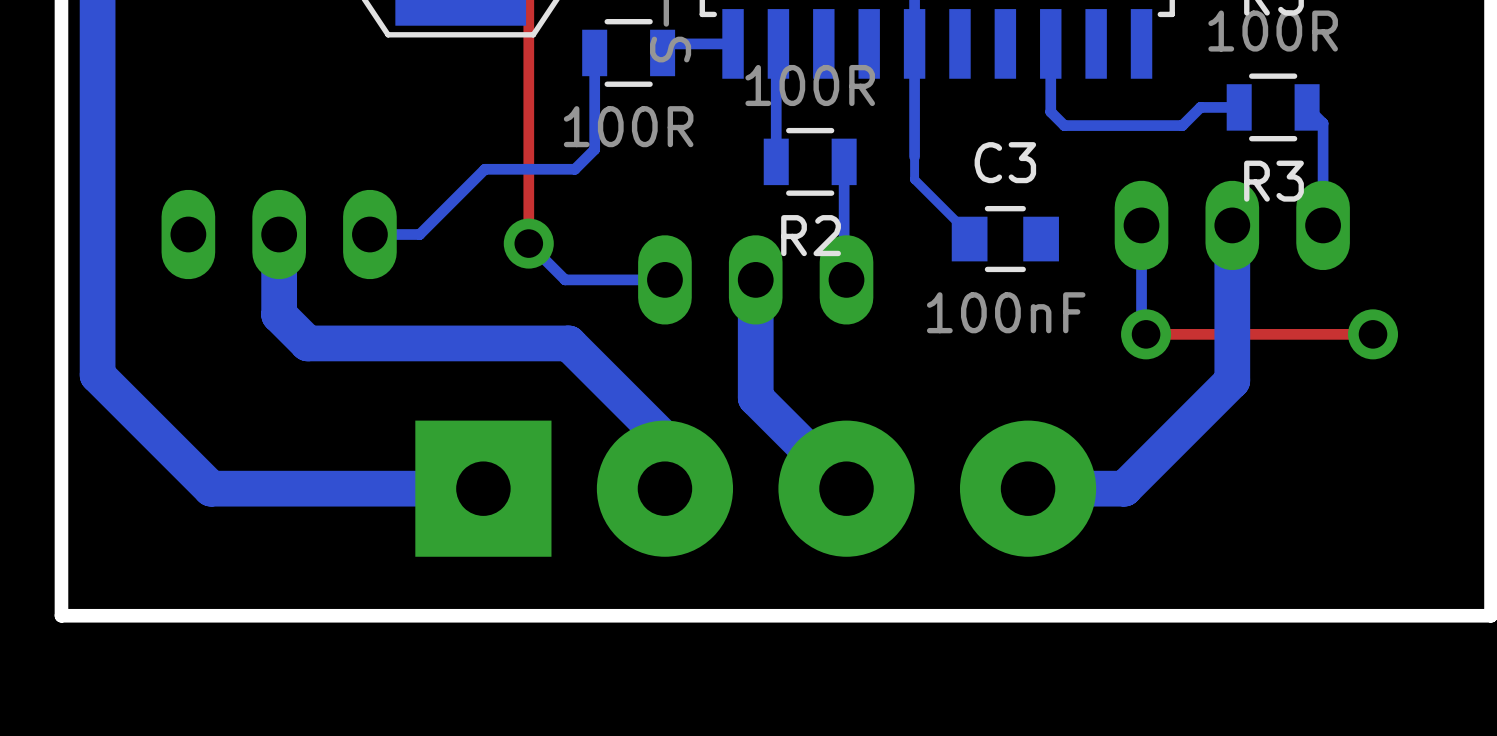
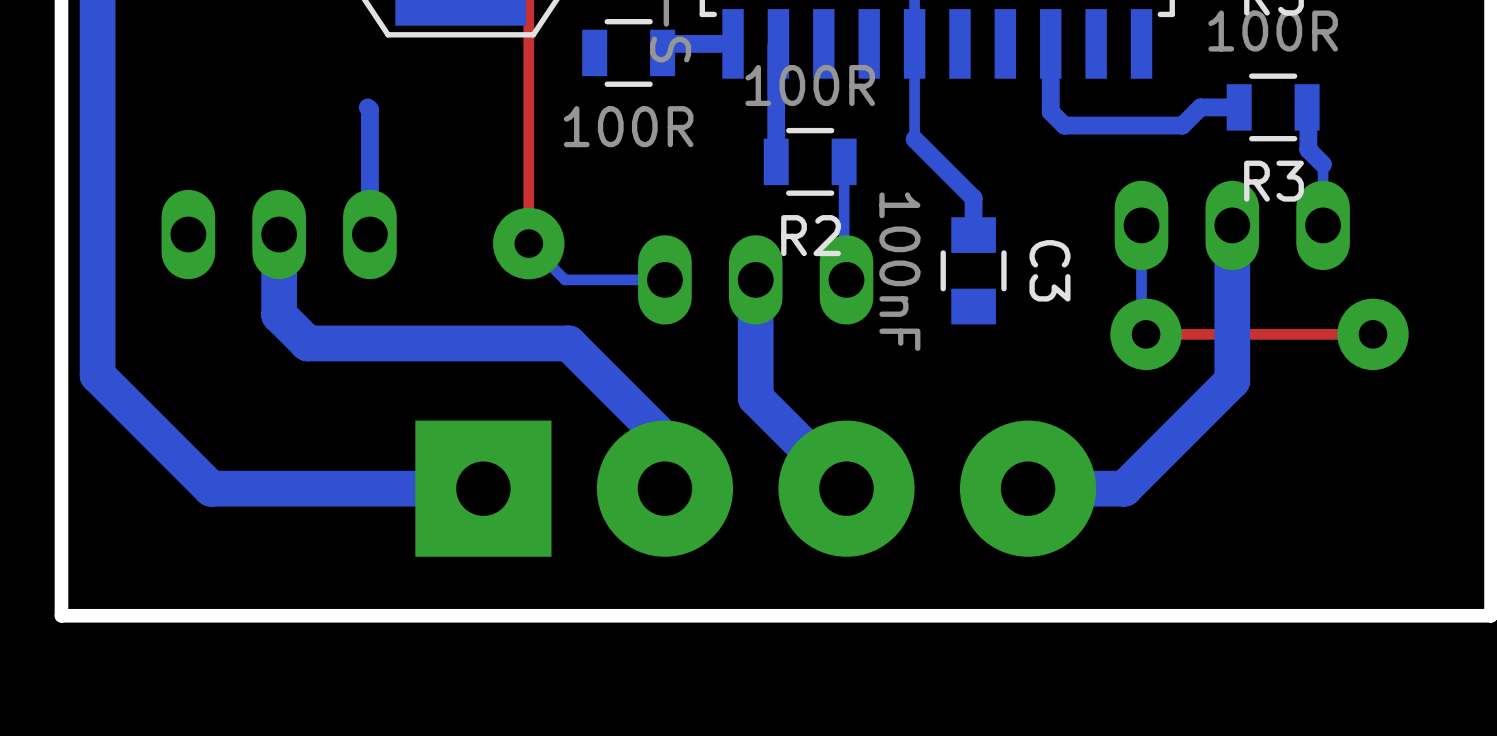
bottom track width: thin (733, 43) (671, 43) -> thick (733, 43) (671, 43)
bottom track width: thin (1050, 43) (1050, 111) (1064, 125) (1182, 125) (1200, 107) (1239, 107) -> thick (1050, 43) (1050, 111) (1064, 125) (1182, 125) (1200, 107) (1239, 107)
bottom track width: thin (776, 46) (776, 161) -> thick (776, 46) (776, 161)
bottom track: (594, 52) (594, 149) (574, 169) (484, 169) (419, 234) (369, 234) -> (367, 107) (369, 109) (369, 234)
bottom track: (1308, 108) (1323, 123) (1323, 164) -> (1307, 107) (1308, 149) (1323, 164)
bottom track: (914, 139) (914, 179) (969, 234) (969, 239) -> (914, 139) (973, 198) (973, 235)
via size: [503, 218, 554, 269] -> [493, 207, 565, 280]
C3 rotation: 0° (1005, 239) -> 90° clockwise (973, 270)
via size: [1121, 309, 1172, 360] -> [1110, 298, 1182, 371]
via size: [1347, 309, 1399, 360] -> [1337, 298, 1409, 371]

